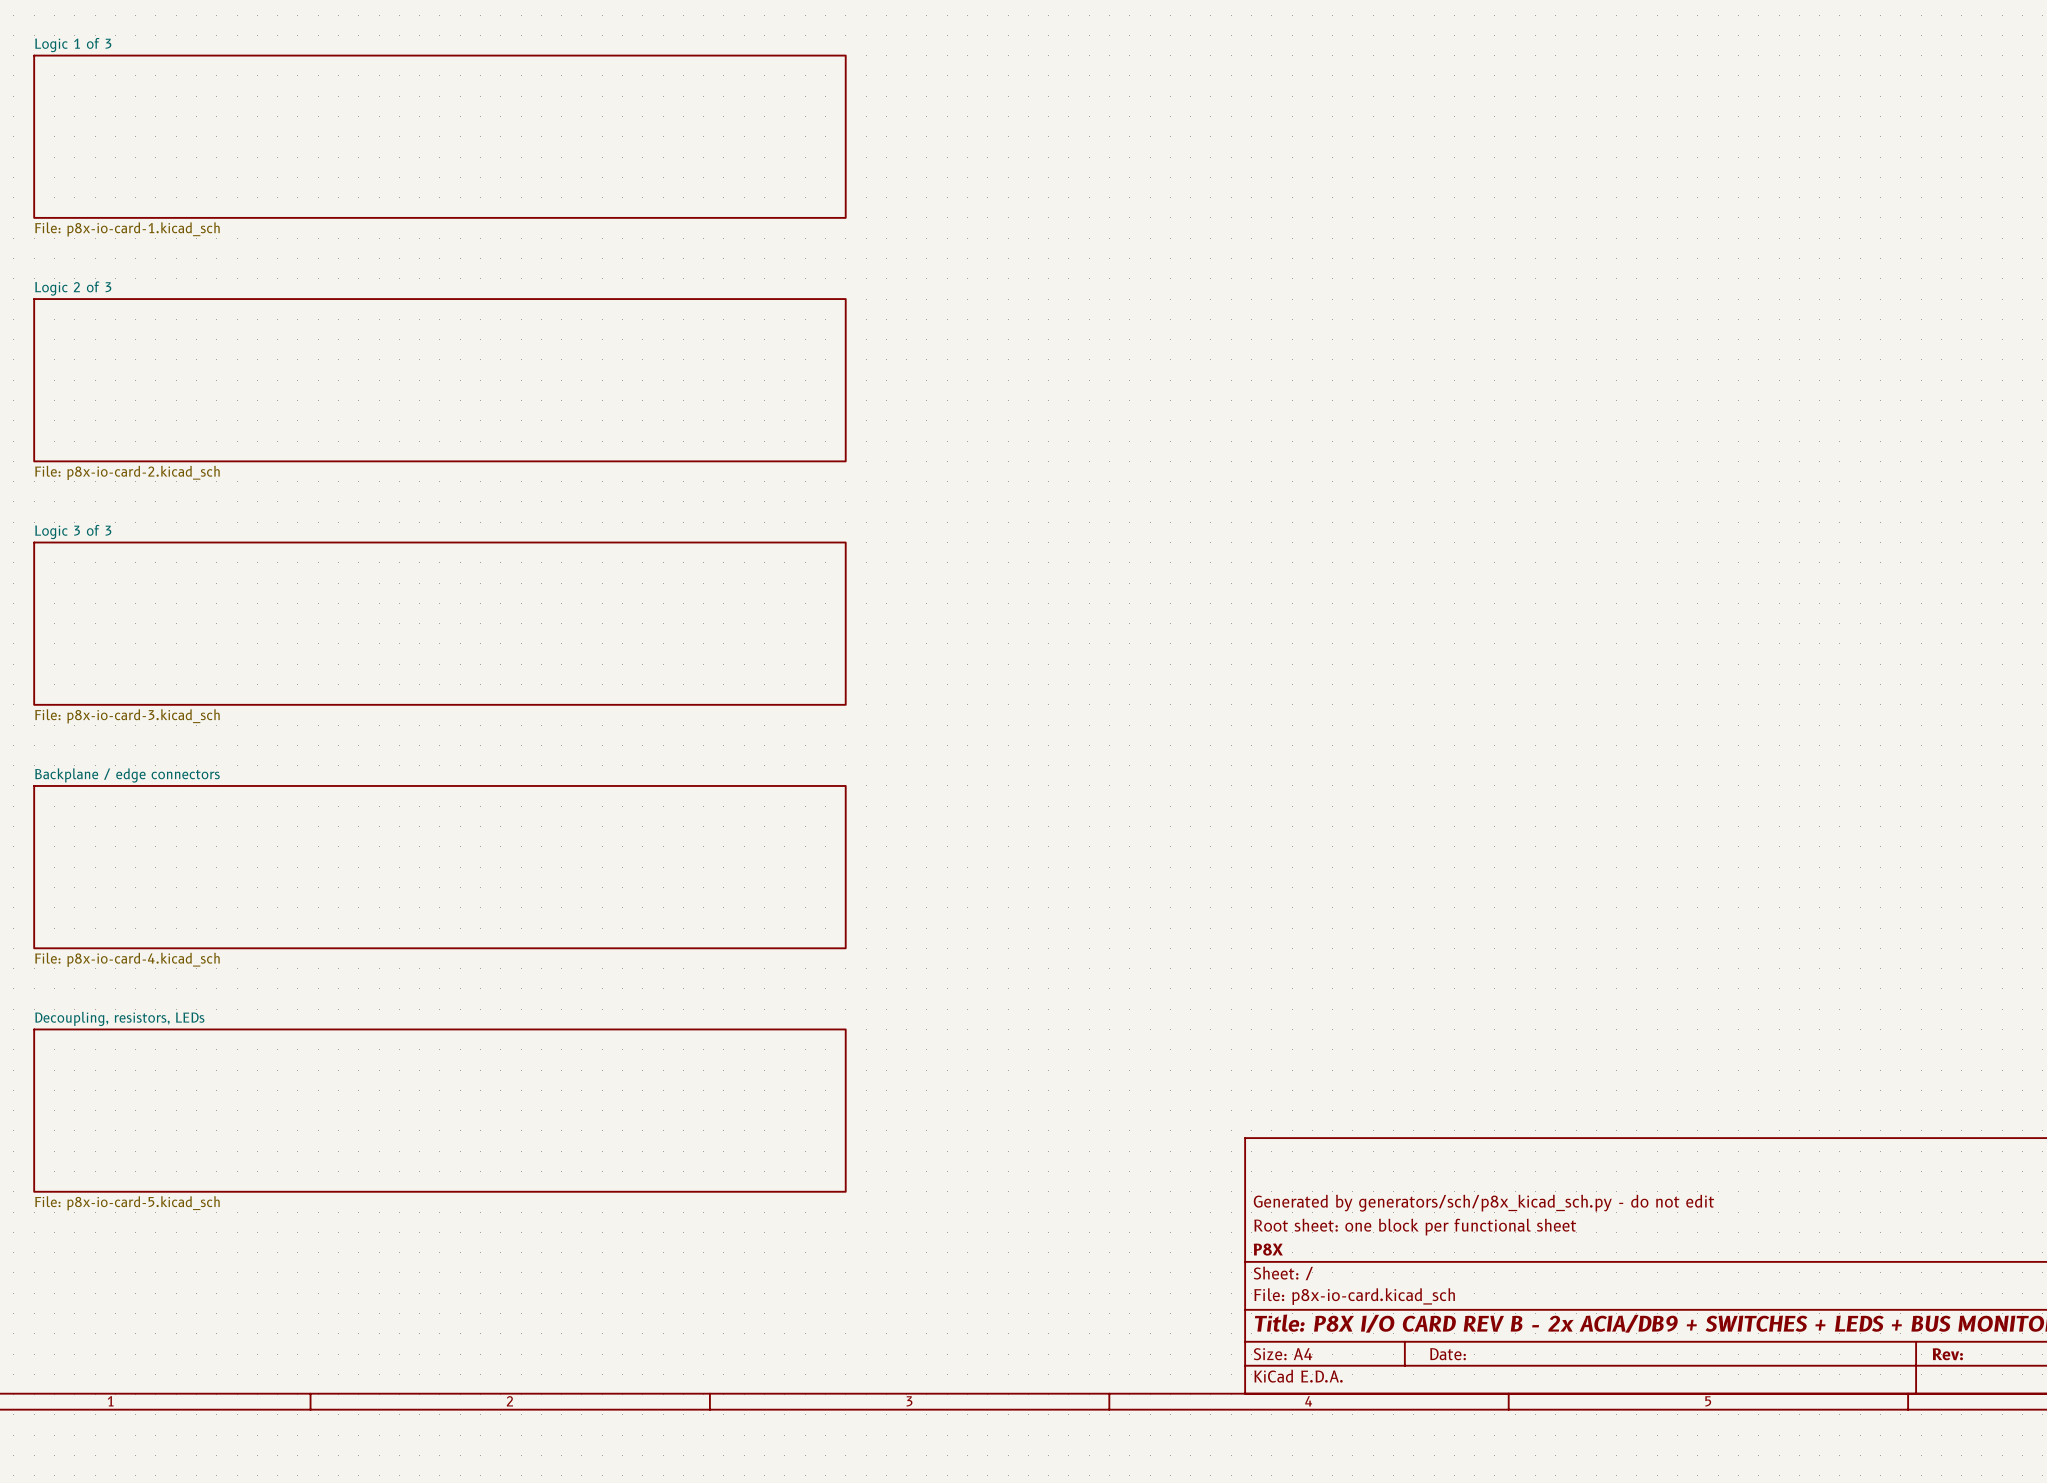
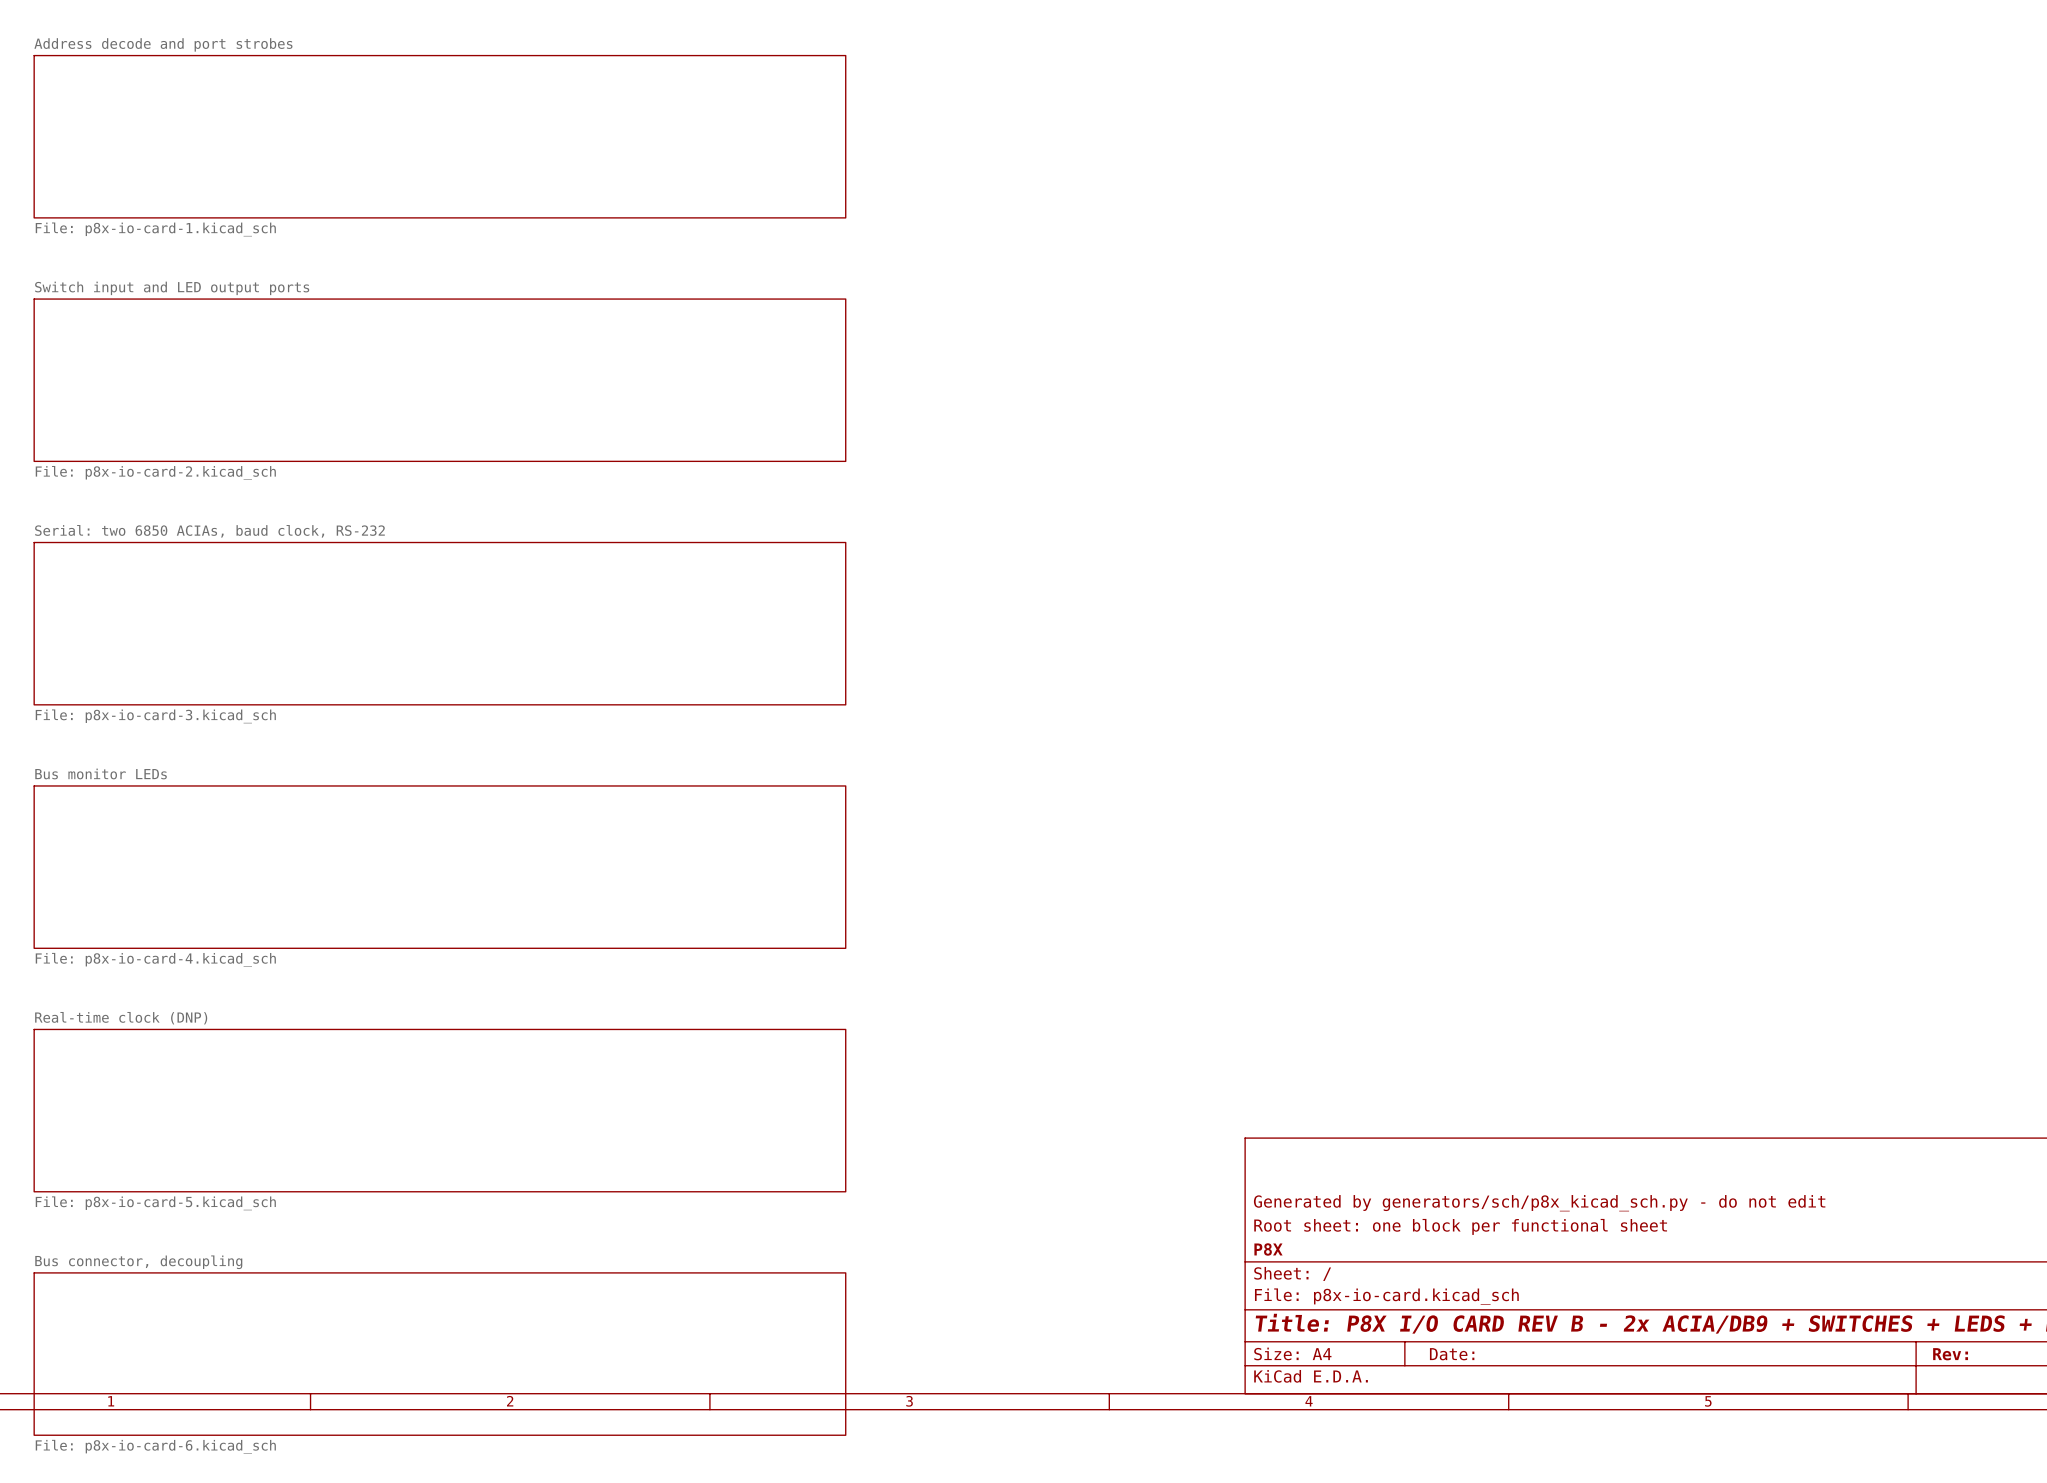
sheet Logic 1 of 3 name: Logic 1 of 3 (73, 45) -> Address decode and port strobes (163, 44)
sheet Logic 2 of 3 name: Logic 2 of 3 (73, 288) -> Switch input and LED output ports (172, 288)
sheet Logic 3 of 3 name: Logic 3 of 3 (73, 532) -> Serial: two 6850 ACIAs, baud clock, RS-232 (209, 531)
sheet Backplane / edge connectors name: Backplane / edge connectors (127, 775) -> Bus monitor LEDs (101, 773)
sheet Decoupling, resistors, LEDs name: Decoupling, resistors, LEDs (119, 1018) -> Real-time clock (DNP) (121, 1018)
sheet Bus connector, decoupling: none -> File: p8x-io-card-6.kicad_sch (439, 1354)

